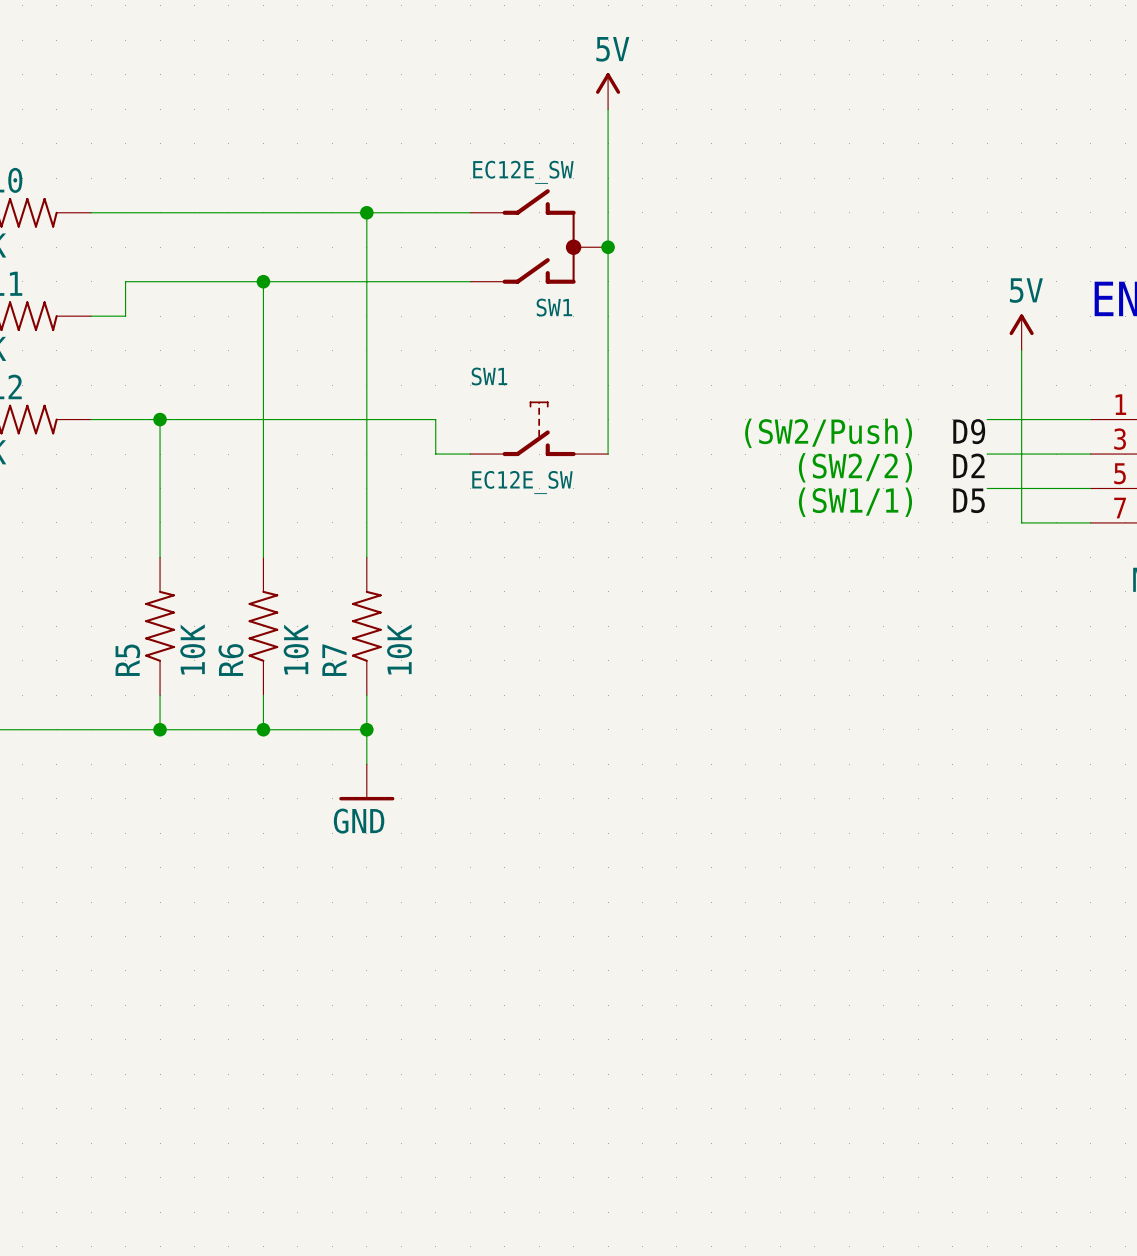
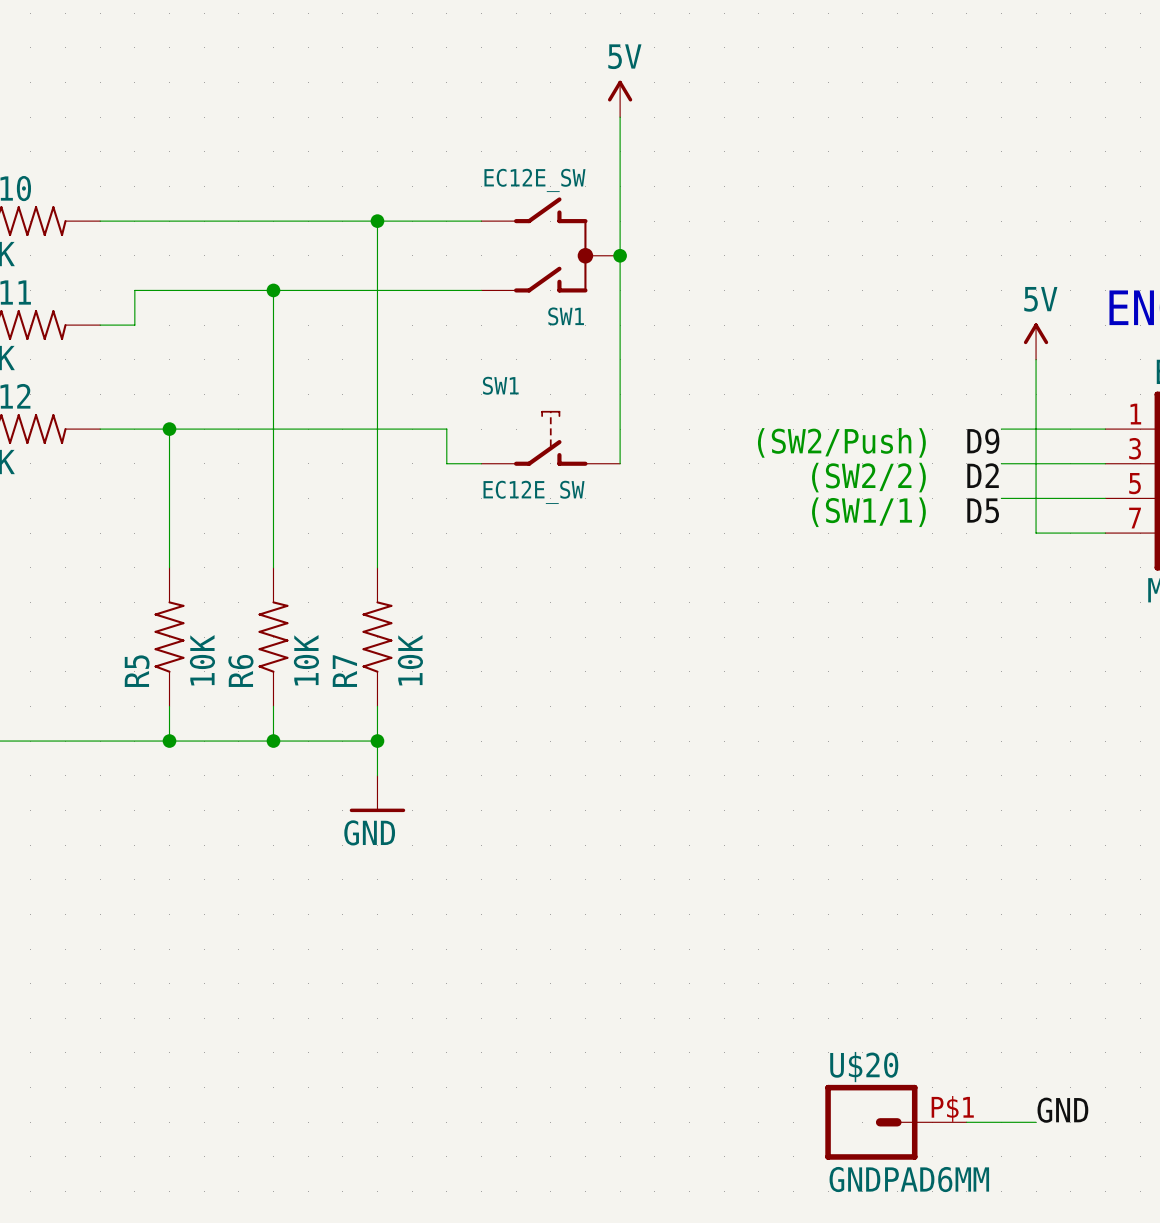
label: none -> GND (1062, 1110)
U$20: none -> GNDPAD6MM (896, 1122)
wire: none -> (966, 1122) (1036, 1122)

